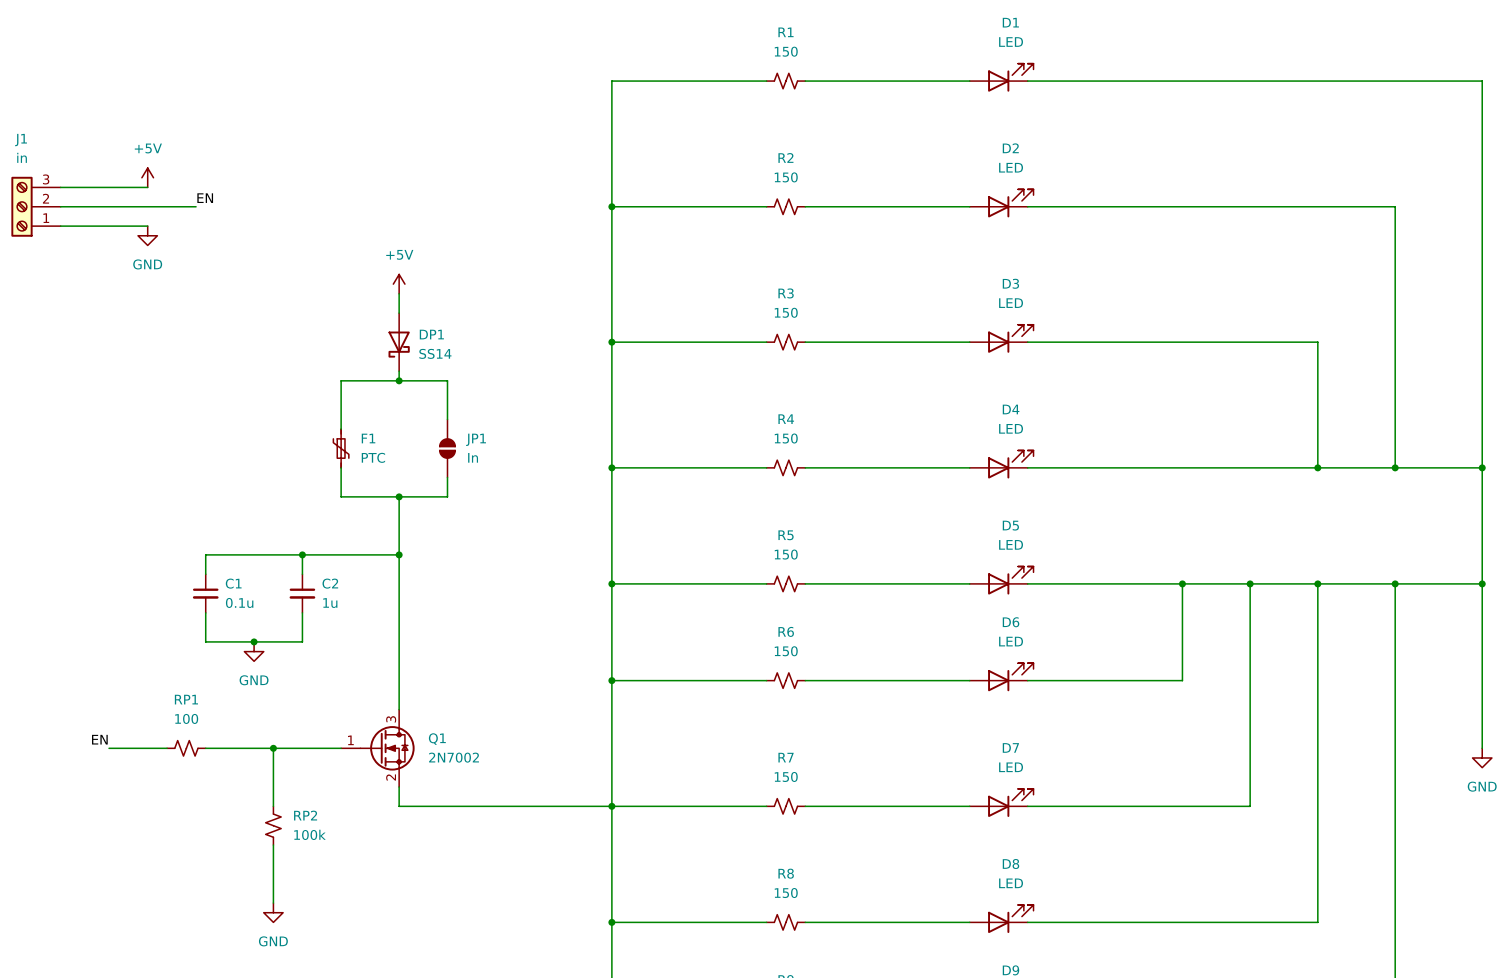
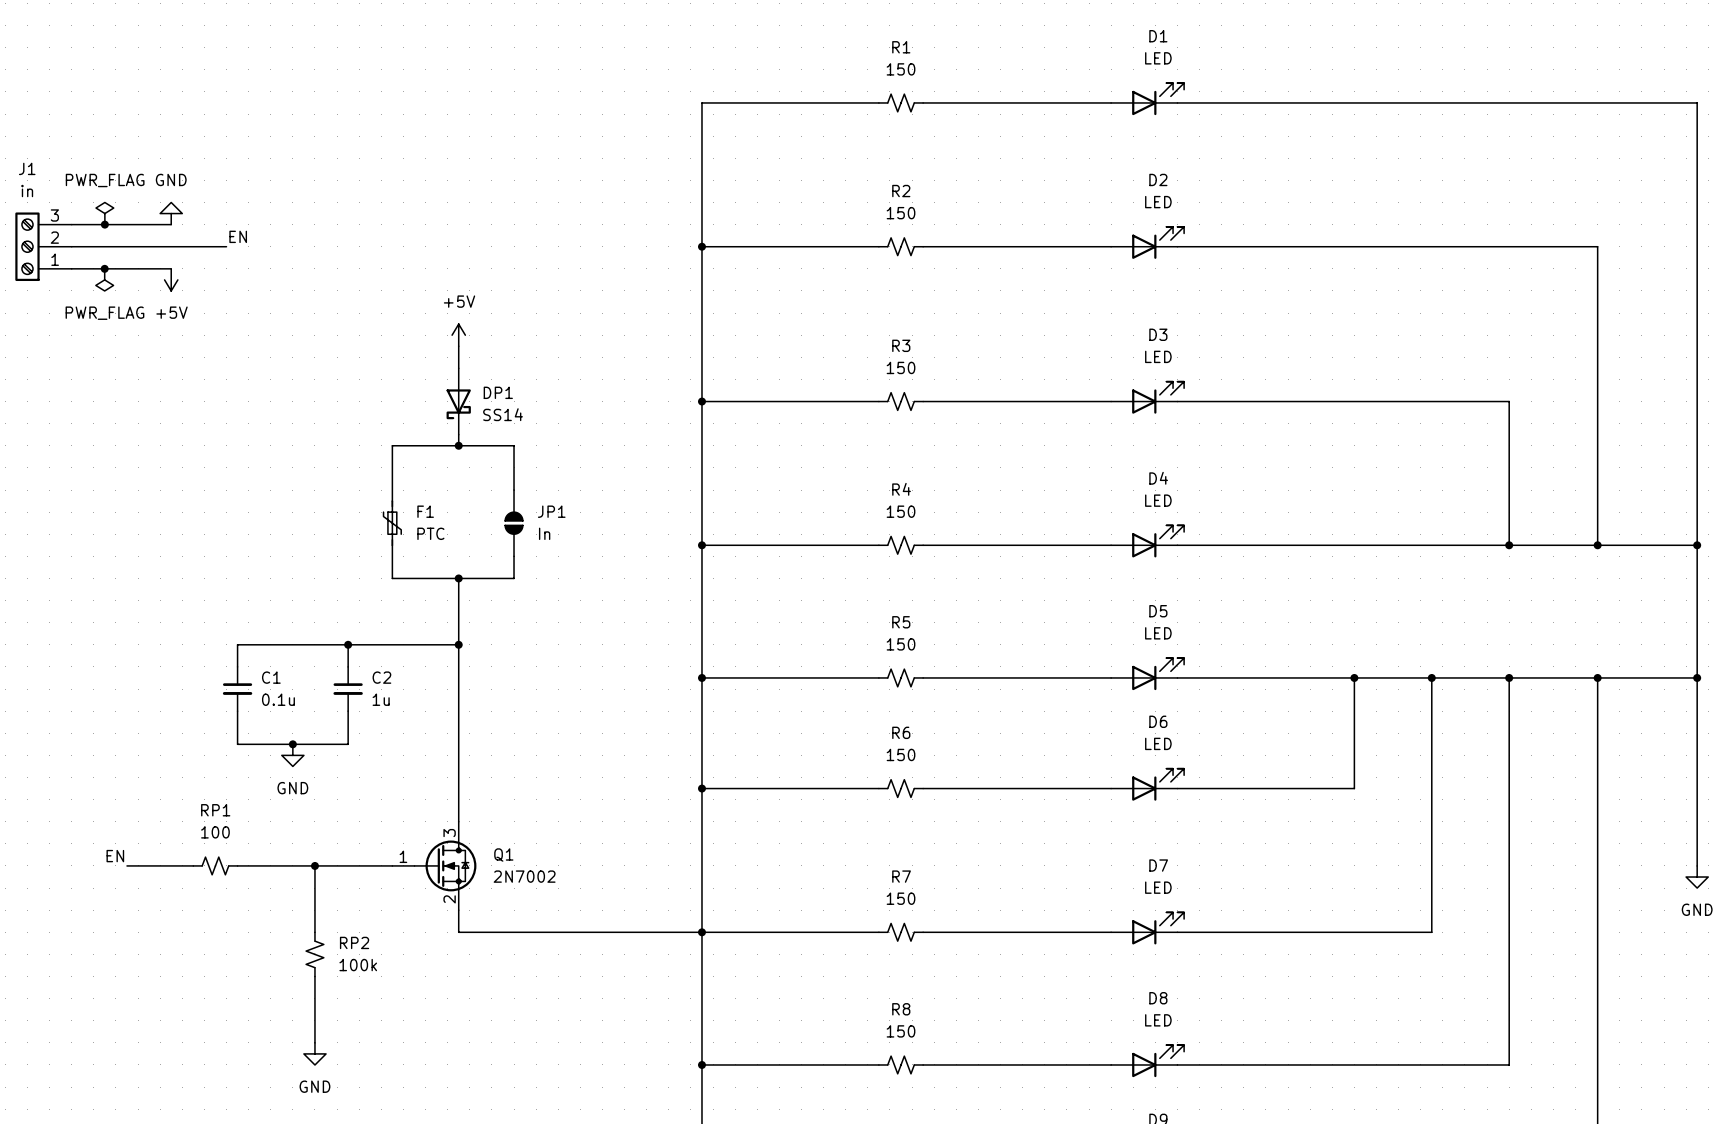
power symbol: none -> PWR_FLAG (104, 213)
power symbol: +5V (147, 177) -> GND (171, 213)
junction: none -> (104, 224)
junction: none -> (104, 268)
power symbol: none -> PWR_FLAG (104, 279)
power symbol: GND (147, 235) -> +5V (171, 279)

